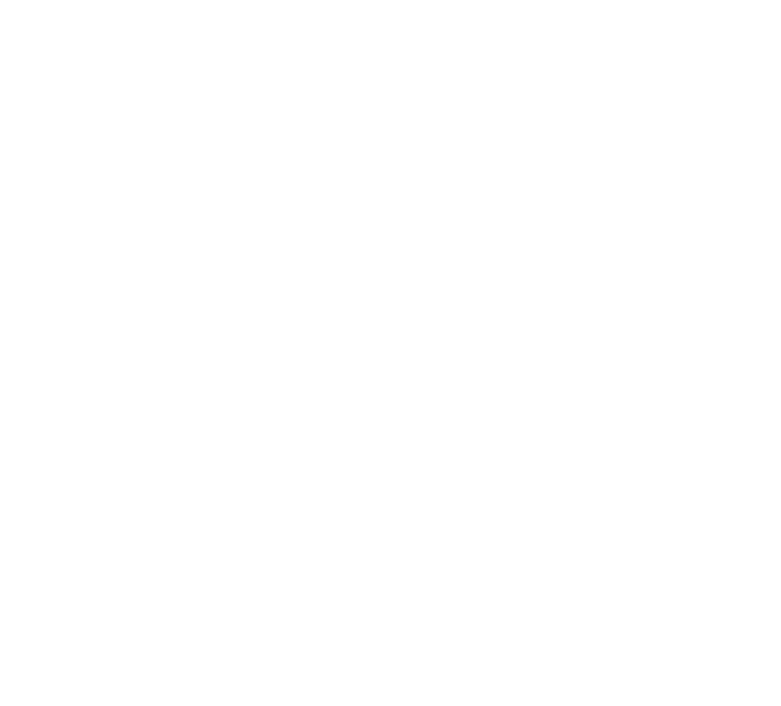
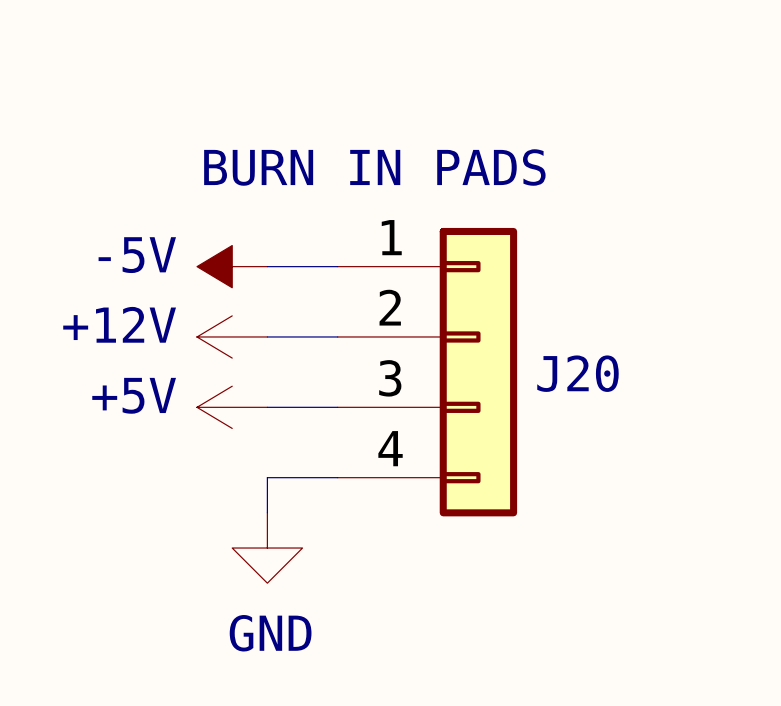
text: none -> BURN IN PADS (374, 167)
power symbol: none -> -5V (232, 266)
wire: none -> (267, 266) (337, 266)
power symbol: none -> +12V (232, 336)
wire: none -> (267, 336) (337, 336)
J20: none -> (427, 372)
power symbol: none -> +5V (232, 407)
wire: none -> (267, 407) (337, 407)
wire: none -> (337, 477) (267, 477) (267, 512)
power symbol: none -> GND (267, 548)

